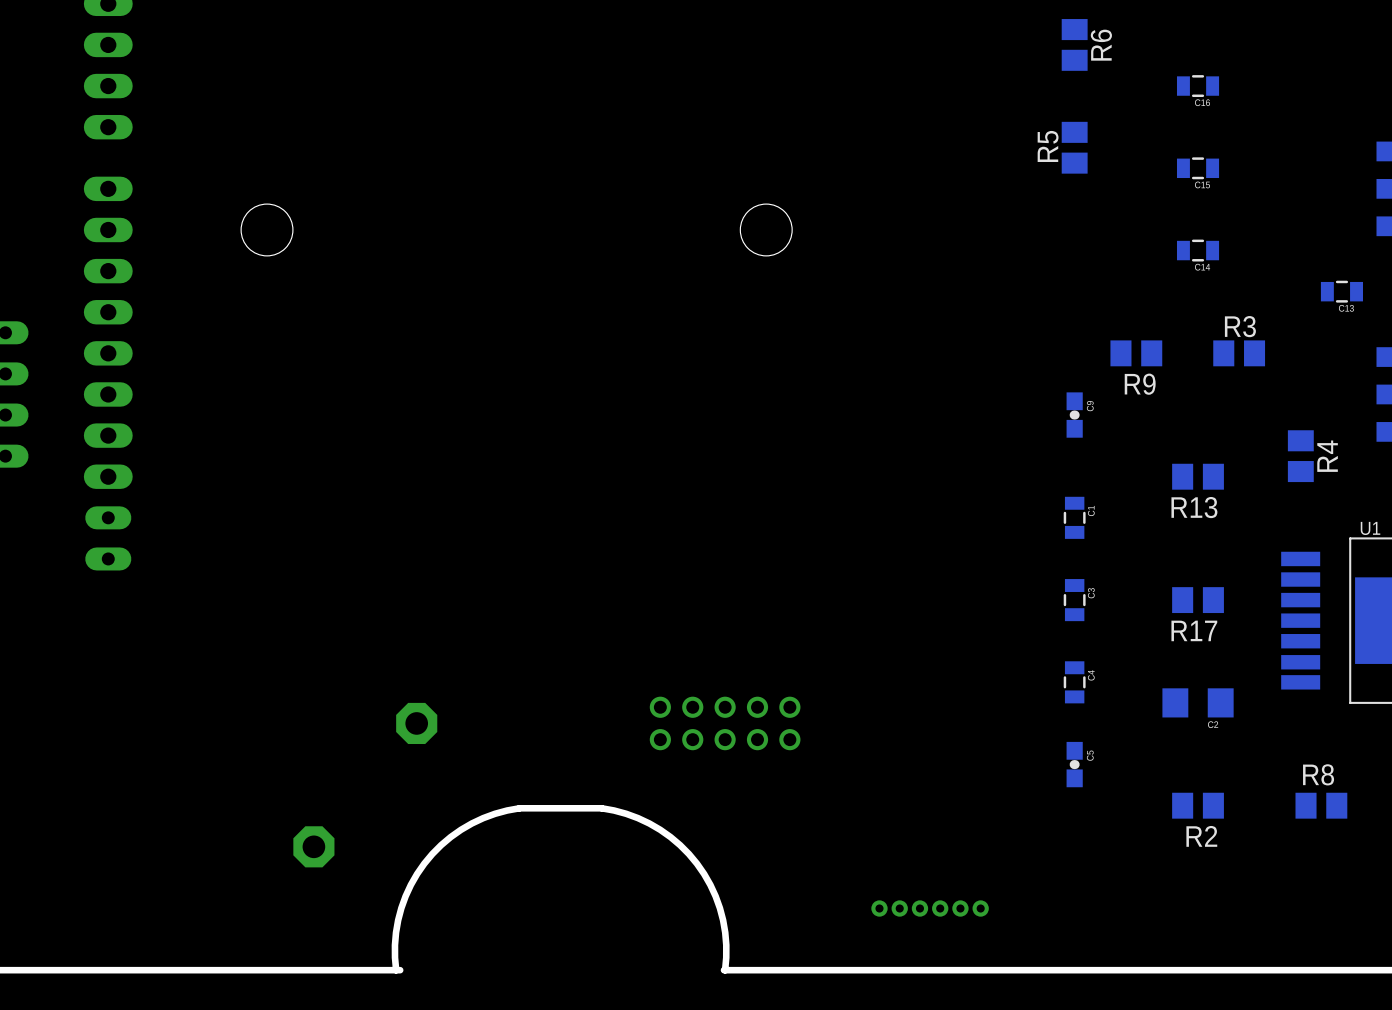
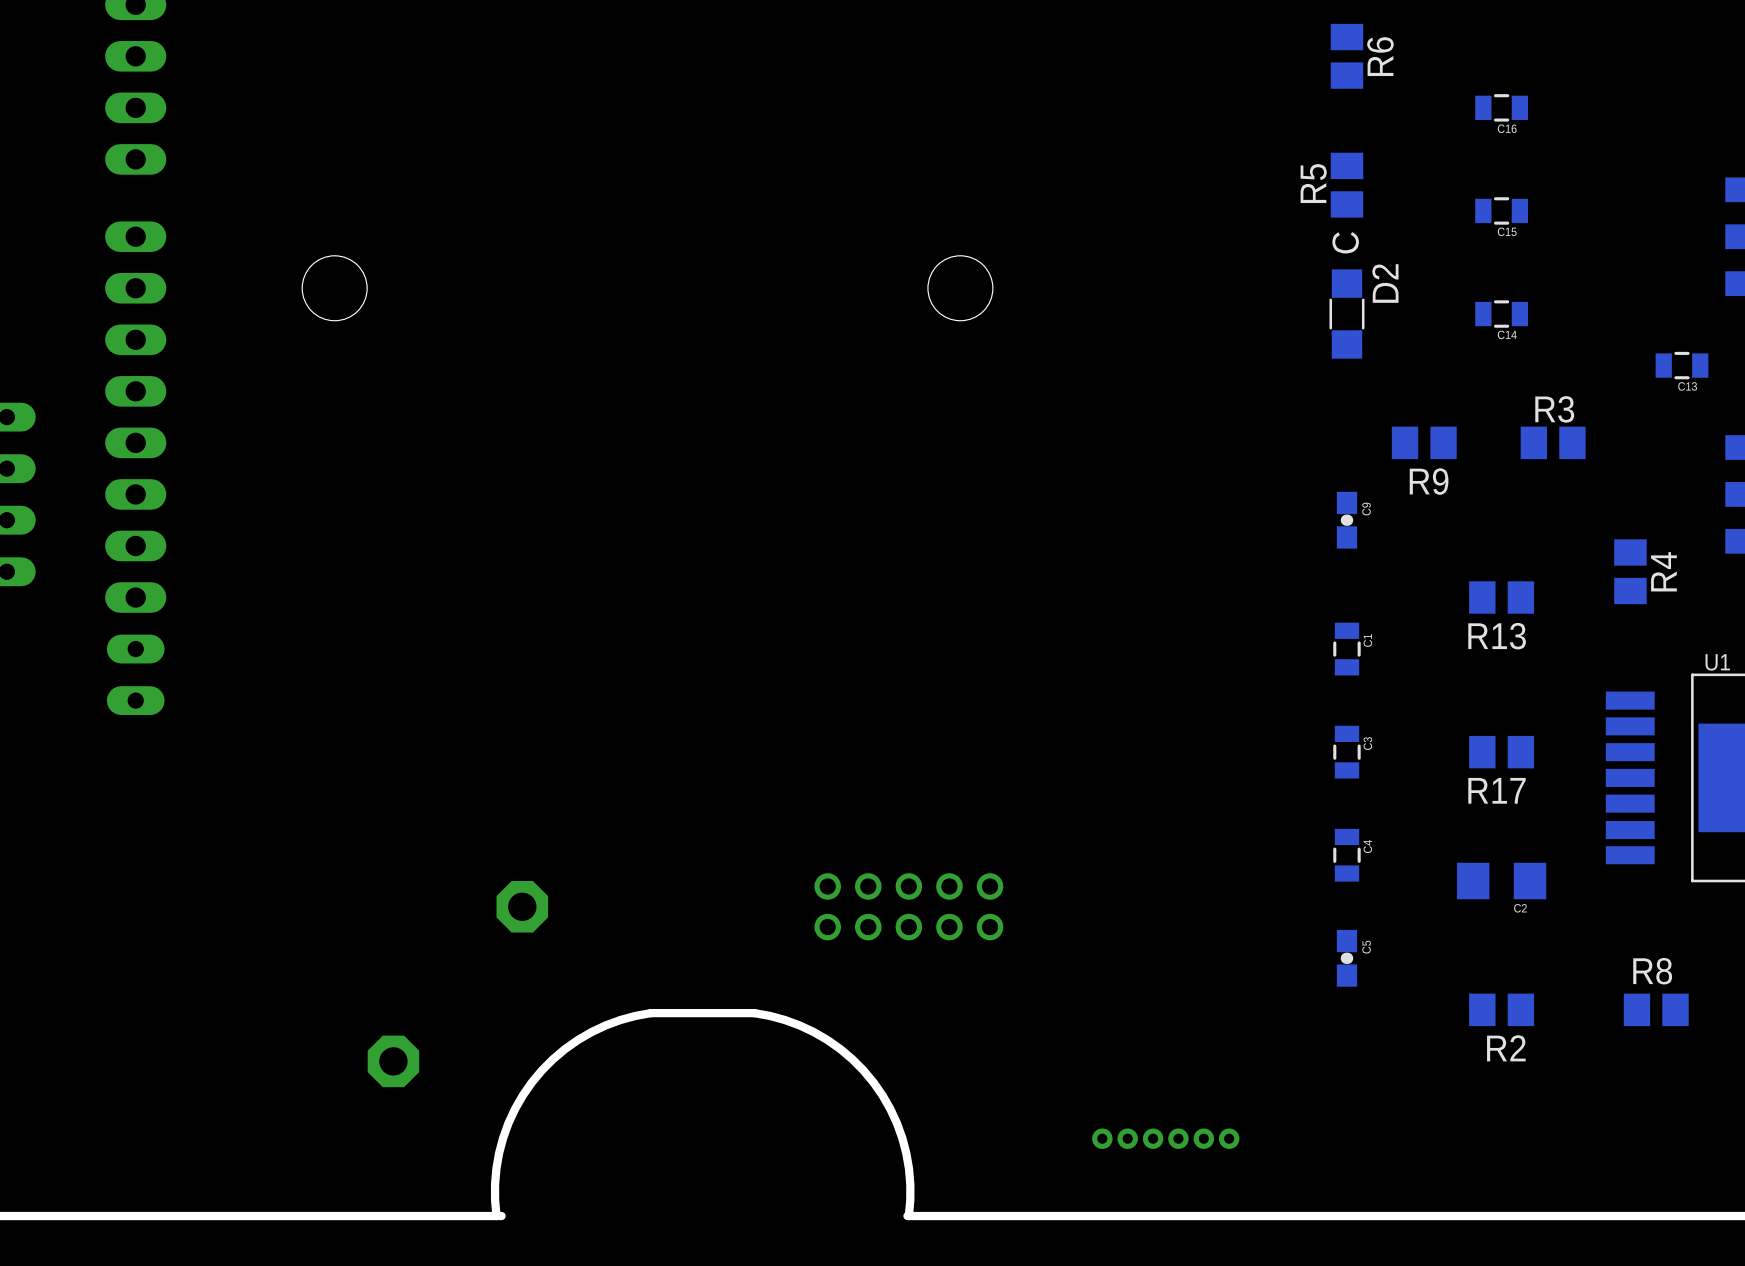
D2: none -> (1346, 314)

